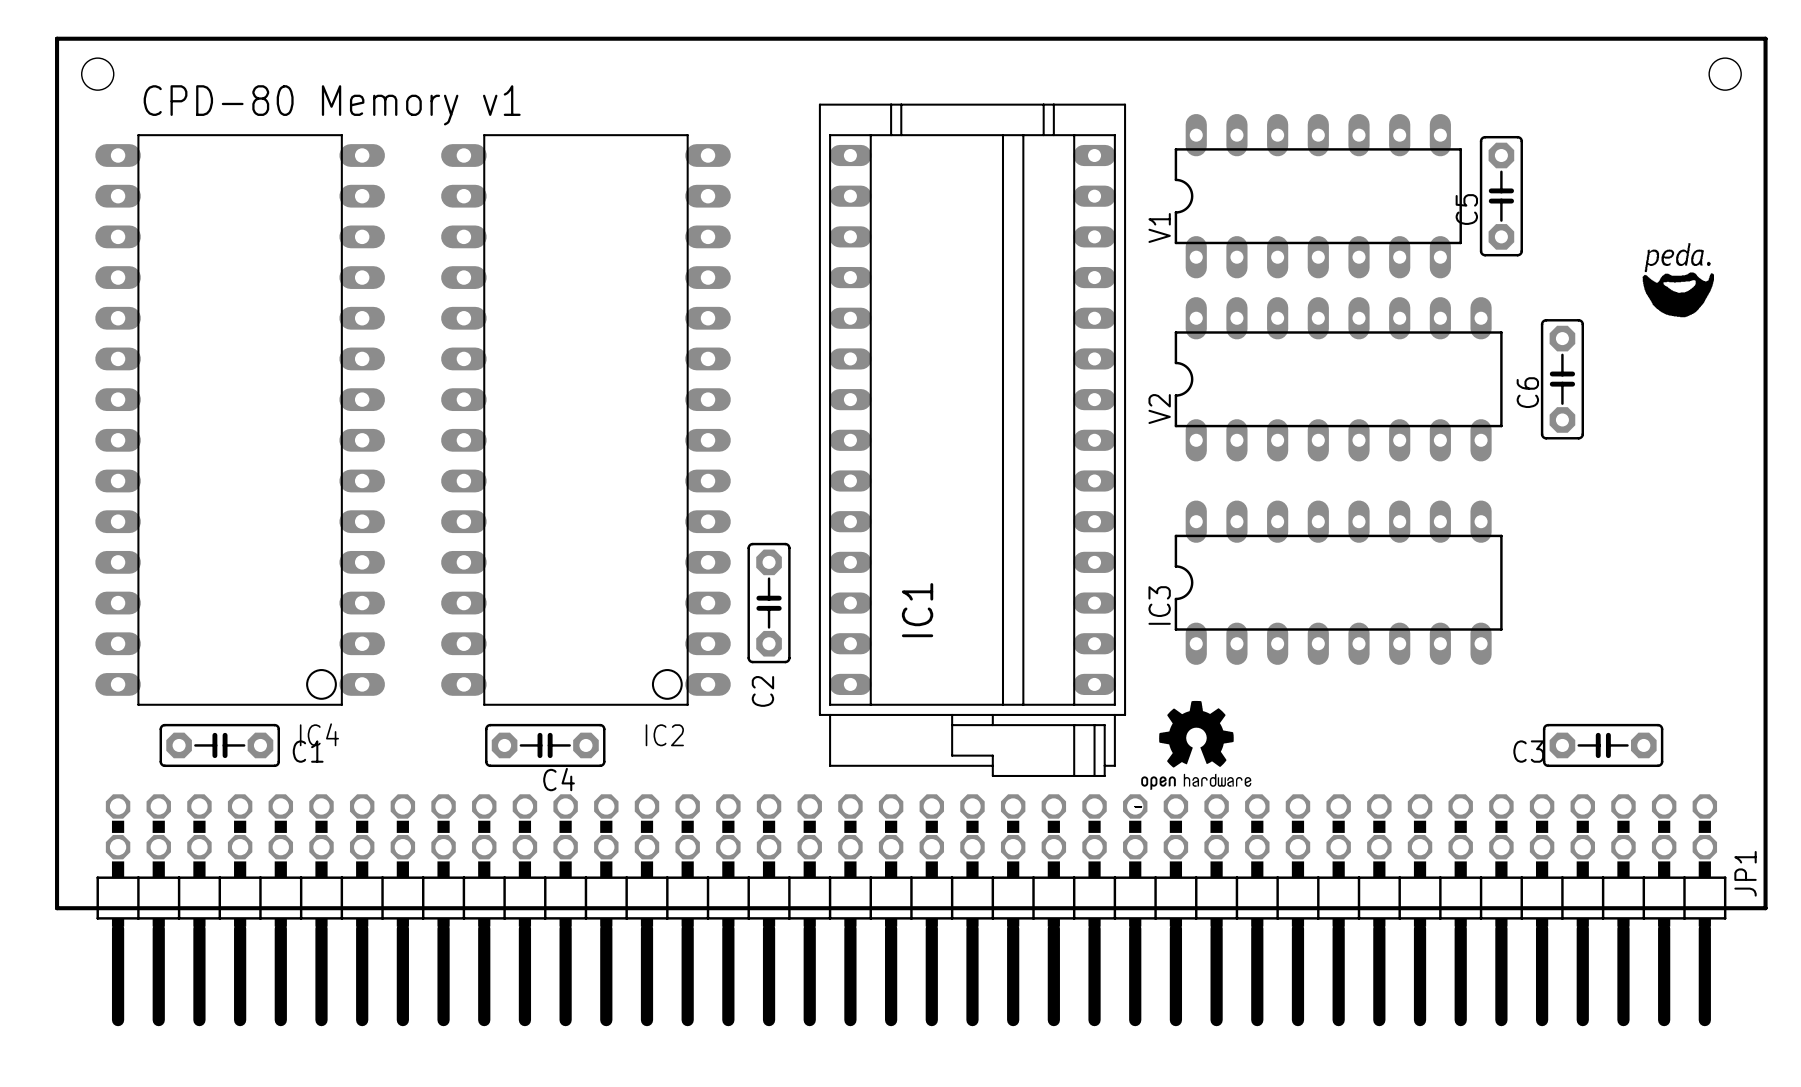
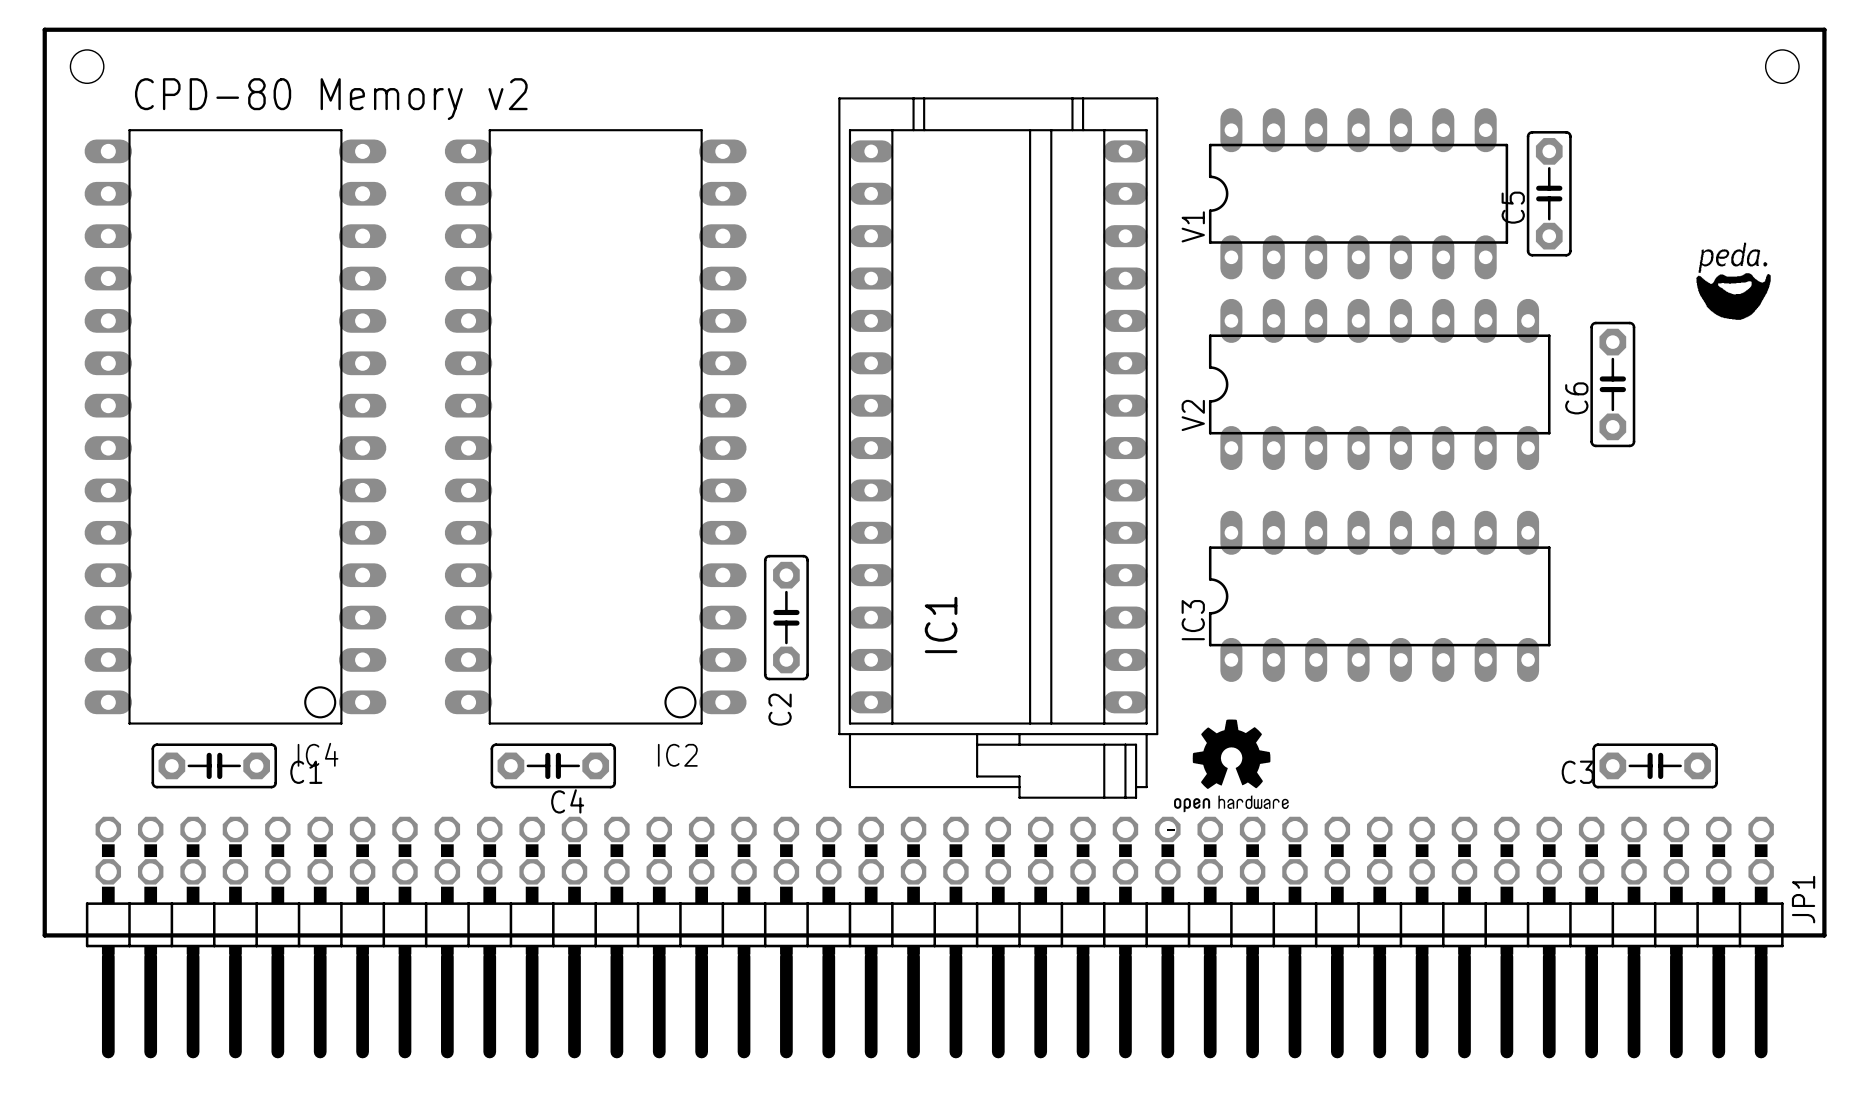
text: CPD-80 Memory v1 (332, 105) -> CPD-80 Memory v2 (331, 99)

